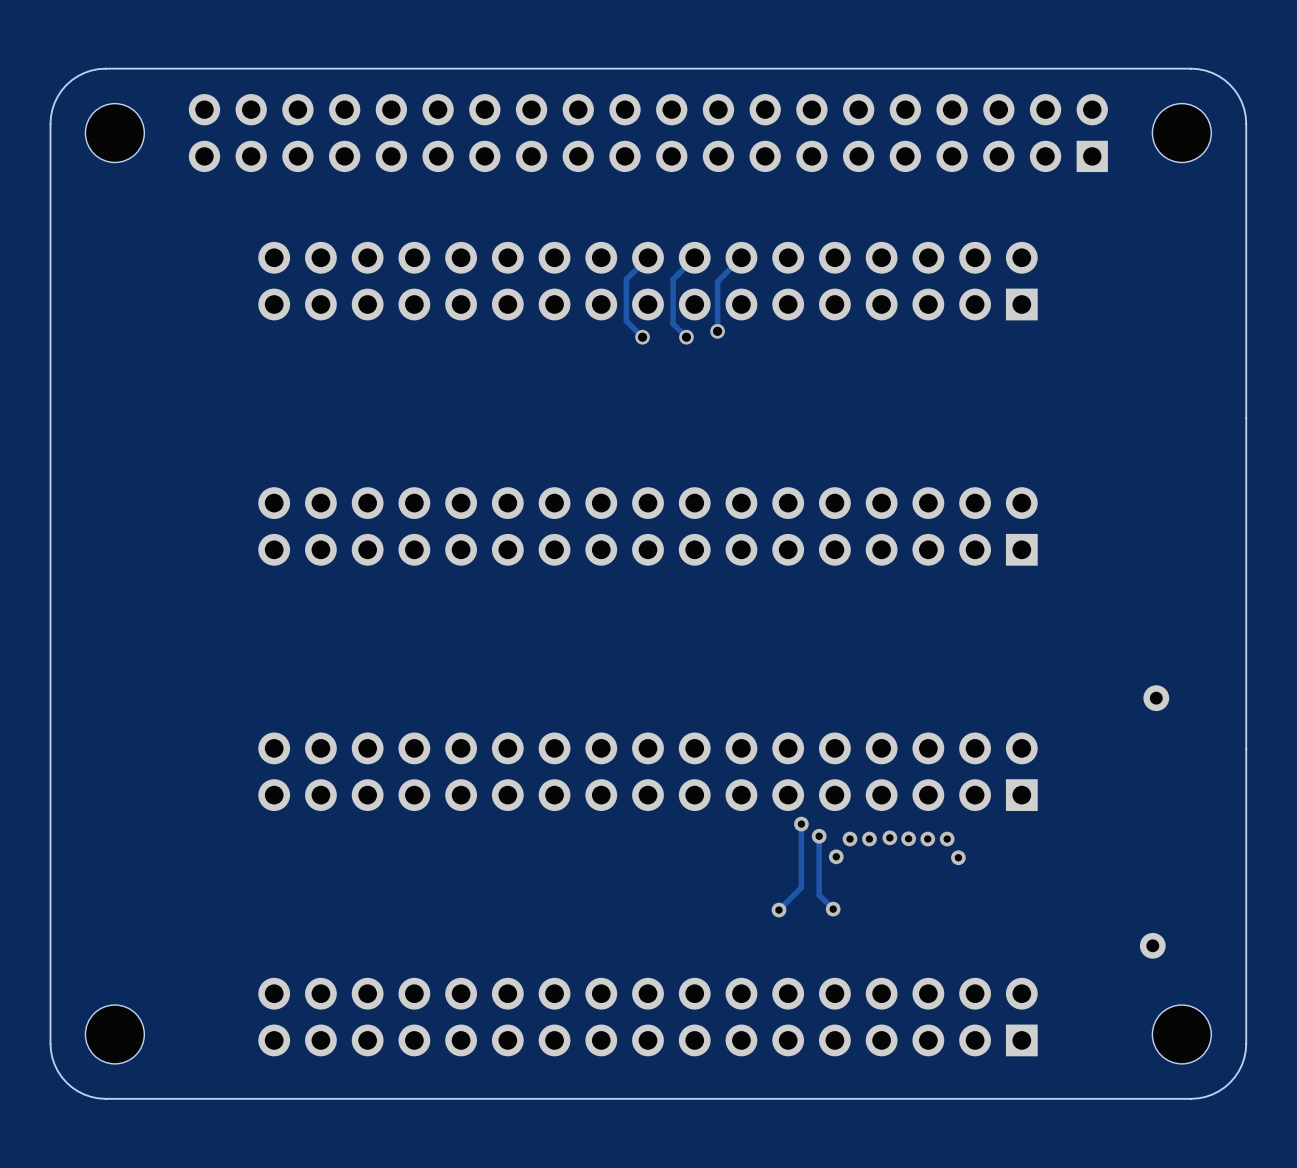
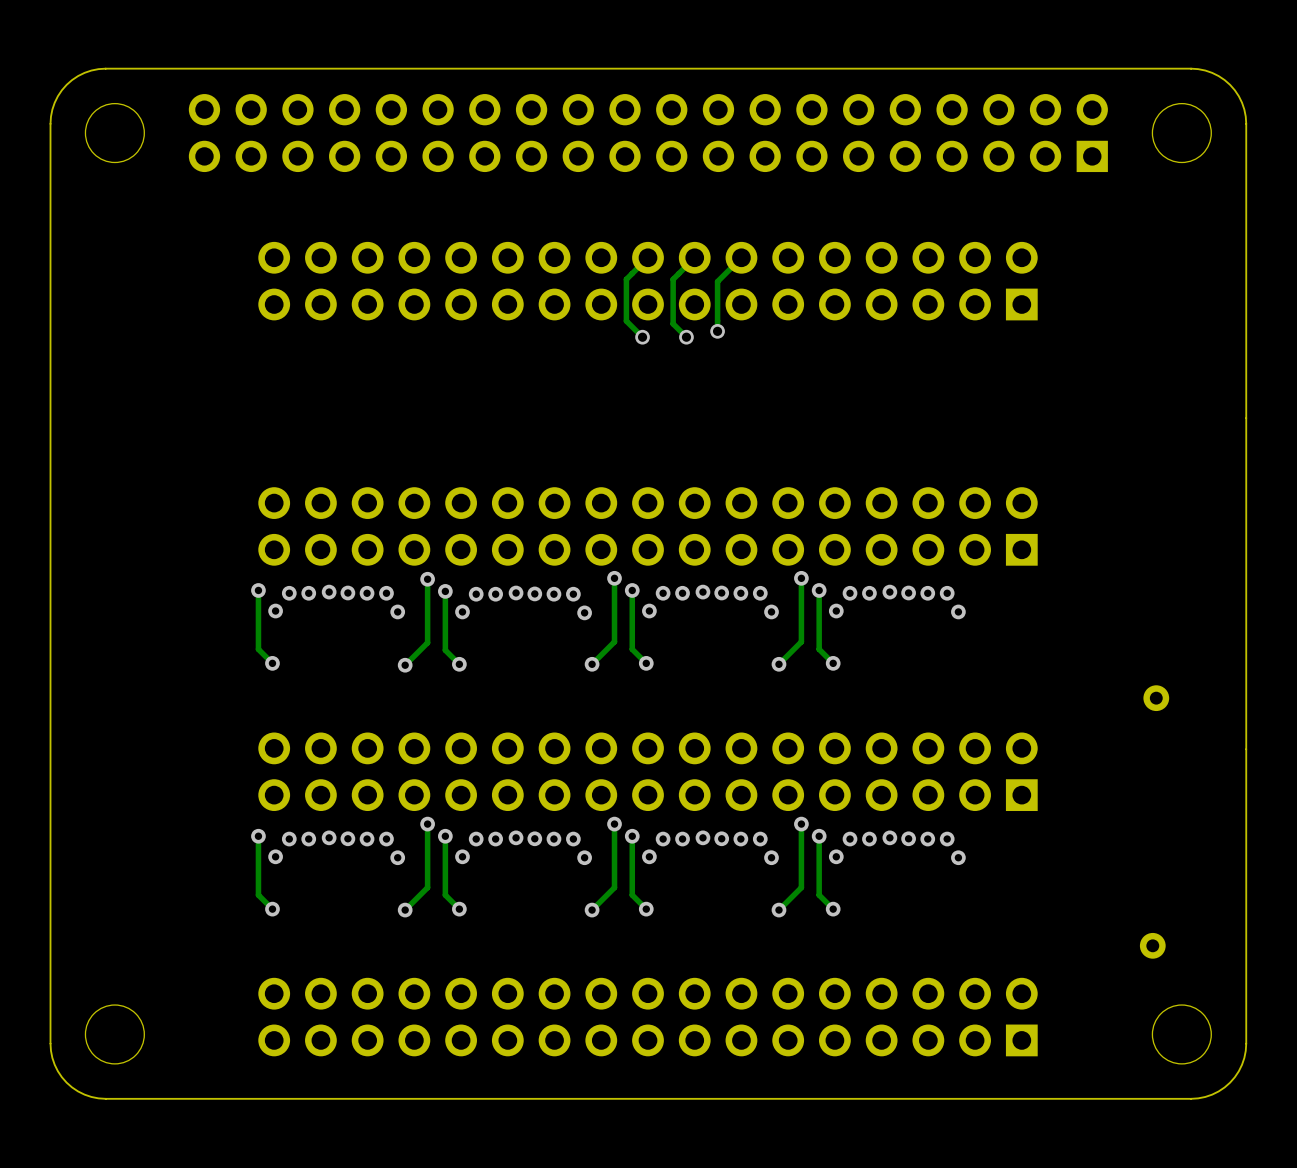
track: none -> (614, 578) (614, 641) (592, 664)
via: none -> (614, 578)
track: none -> (801, 578) (801, 641) (778, 664)
via: none -> (801, 578)
track: none -> (427, 579) (427, 642) (405, 665)
via: none -> (427, 579)
track: none -> (258, 590) (258, 649) (272, 663)
via: none -> (258, 590)
track: none -> (632, 590) (632, 649) (646, 663)
via: none -> (632, 590)
track: none -> (819, 590) (819, 649) (833, 663)
via: none -> (819, 590)
track: none -> (445, 591) (445, 650) (459, 664)
via: none -> (445, 591)
via: none -> (329, 592)
via: none -> (702, 592)
via: none -> (889, 592)
via: none -> (289, 593)
via: none -> (308, 593)
via: none -> (347, 593)
via: none -> (367, 593)
via: none -> (386, 593)
via: none -> (516, 593)
via: none -> (534, 593)
via: none -> (663, 593)
via: none -> (682, 593)
via: none -> (721, 593)
via: none -> (740, 593)
via: none -> (760, 593)
via: none -> (850, 593)
via: none -> (869, 593)
via: none -> (908, 593)
via: none -> (927, 593)
via: none -> (947, 593)
via: none -> (476, 594)
via: none -> (495, 594)
via: none -> (553, 594)
via: none -> (573, 594)
via: none -> (275, 611)
via: none -> (397, 611)
via: none -> (462, 611)
via: none -> (649, 611)
via: none -> (771, 611)
via: none -> (836, 611)
via: none -> (958, 611)
via: none -> (584, 612)
via: none -> (272, 663)
via: none -> (646, 663)
via: none -> (833, 663)
via: none -> (459, 664)
via: none -> (592, 664)
via: none -> (778, 664)
via: none -> (405, 665)
track: none -> (427, 824) (427, 887) (405, 910)
via: none -> (427, 824)
track: none -> (614, 824) (614, 887) (592, 910)
via: none -> (614, 824)
track: none -> (258, 836) (258, 895) (272, 909)
via: none -> (258, 836)
track: none -> (445, 836) (445, 895) (459, 909)
via: none -> (445, 836)
track: none -> (632, 836) (632, 895) (646, 909)
via: none -> (632, 836)
via: none -> (329, 837)
via: none -> (516, 837)
via: none -> (702, 837)
via: none -> (347, 838)
via: none -> (534, 838)
via: none -> (721, 838)
via: none -> (289, 839)
via: none -> (308, 839)
via: none -> (367, 839)
via: none -> (386, 839)
via: none -> (476, 839)
via: none -> (495, 839)
via: none -> (553, 839)
via: none -> (573, 839)
via: none -> (663, 839)
via: none -> (682, 839)
via: none -> (740, 839)
via: none -> (760, 839)
via: none -> (275, 856)
via: none -> (462, 856)
via: none -> (649, 856)
via: none -> (397, 857)
via: none -> (584, 857)
via: none -> (771, 857)
via: none -> (272, 909)
via: none -> (459, 909)
via: none -> (646, 909)
via: none -> (405, 910)
via: none -> (592, 910)

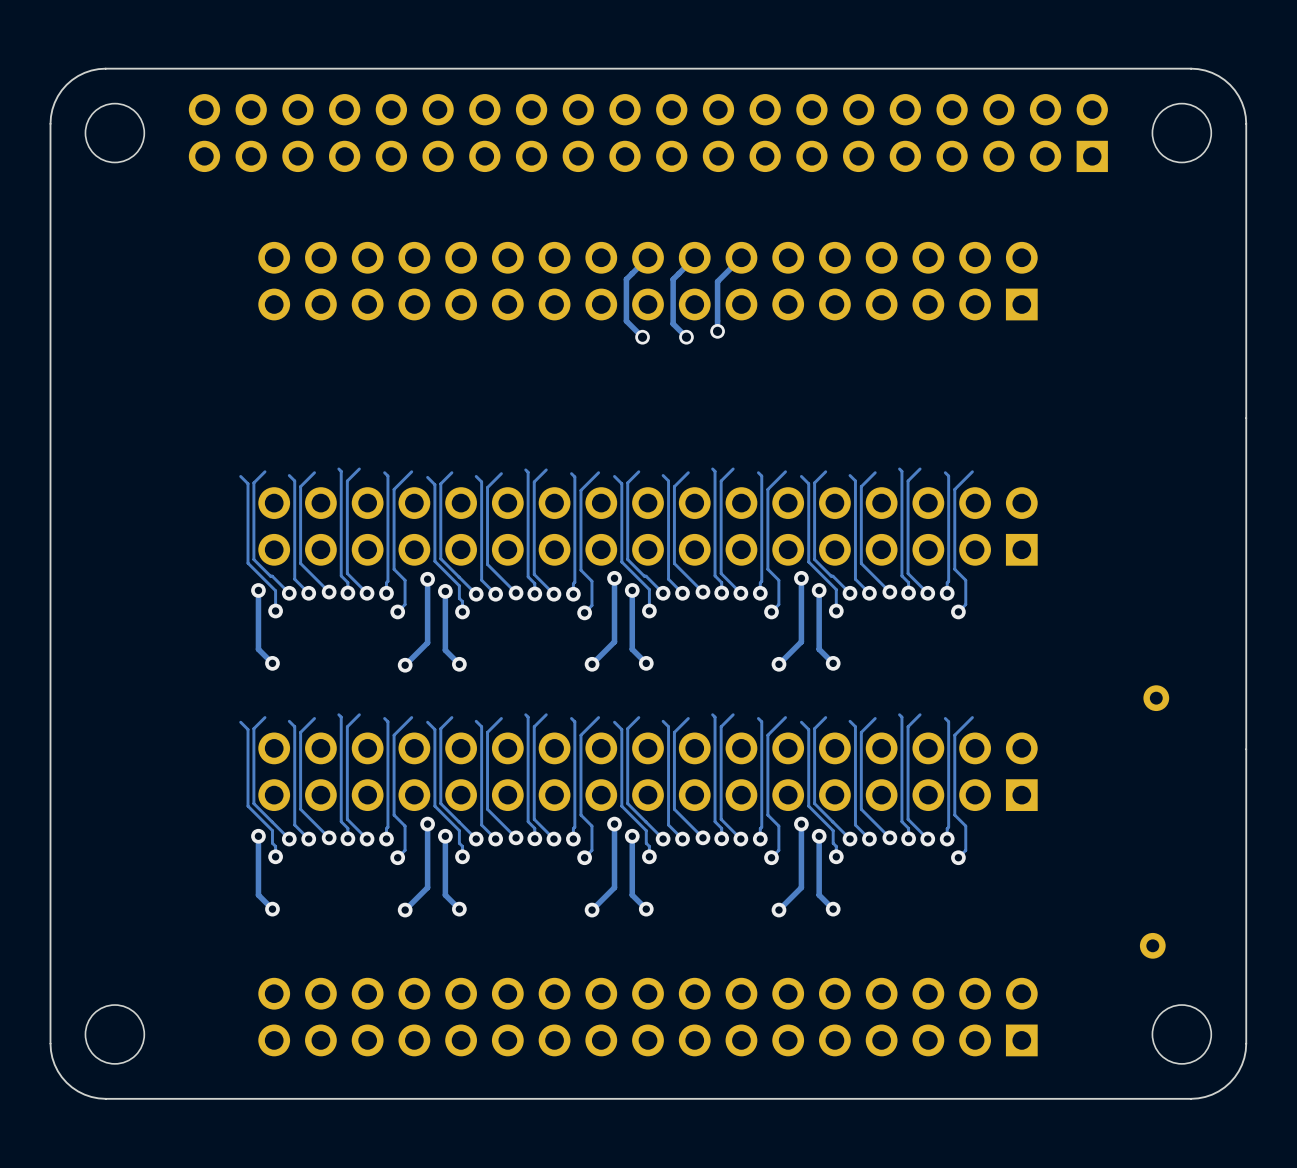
track: none -> (338, 468) (341, 471) (341, 575) (347, 582) (347, 593)
track: none -> (359, 468) (347, 481) (347, 573) (367, 593)
track: none -> (712, 468) (715, 471) (715, 575) (721, 582) (721, 593)
track: none -> (733, 468) (721, 481) (721, 573) (740, 593)
track: none -> (899, 468) (901, 471) (901, 575) (908, 582) (908, 593)
track: none -> (920, 468) (908, 481) (908, 573) (927, 593)
track: none -> (525, 469) (528, 472) (528, 576) (534, 583) (534, 593)
track: none -> (546, 469) (534, 481) (534, 574) (553, 594)
track: none -> (265, 471) (253, 482) (253, 559) (289, 593)
track: none -> (411, 471) (394, 489) (394, 569) (405, 580) (405, 604) (397, 611)
track: none -> (638, 471) (627, 482) (627, 559) (663, 593)
track: none -> (785, 471) (767, 489) (767, 569) (778, 580) (778, 604) (771, 611)
track: none -> (825, 471) (814, 482) (814, 559) (850, 593)
track: none -> (972, 471) (954, 489) (954, 569) (965, 580) (965, 604) (958, 611)
track: none -> (314, 472) (300, 486) (300, 563) (329, 592)
track: none -> (384, 472) (387, 476) (386, 593)
track: none -> (451, 472) (440, 483) (440, 558) (476, 594)
track: none -> (598, 472) (580, 490) (580, 570) (591, 581) (591, 605) (584, 612)
track: none -> (688, 472) (674, 486) (674, 563) (702, 592)
track: none -> (758, 472) (761, 476) (760, 593)
track: none -> (875, 472) (861, 486) (861, 563) (889, 592)
track: none -> (945, 472) (948, 476) (947, 593)
track: none -> (501, 473) (487, 487) (487, 564) (516, 593)
track: none -> (571, 473) (574, 476) (573, 594)
track: none -> (289, 475) (294, 480) (294, 579) (308, 593)
track: none -> (663, 475) (668, 480) (668, 579) (682, 593)
track: none -> (850, 475) (855, 480) (855, 579) (869, 593)
track: none -> (240, 476) (248, 483) (248, 563) (275, 590) (275, 611)
track: none -> (476, 476) (481, 481) (481, 580) (495, 594)
track: none -> (614, 476) (621, 483) (621, 561) (649, 589) (649, 611)
track: none -> (801, 476) (808, 483) (808, 561) (836, 589) (836, 611)
track: none -> (427, 477) (434, 484) (434, 561) (459, 585) (462, 611)
track: none -> (338, 714) (341, 717) (341, 821) (347, 828) (347, 838)
track: none -> (359, 714) (347, 726) (347, 819) (367, 839)
track: none -> (525, 714) (528, 717) (528, 821) (534, 828) (534, 838)
track: none -> (546, 714) (534, 726) (534, 819) (553, 839)
track: none -> (712, 714) (715, 717) (715, 821) (721, 828) (721, 838)
track: none -> (733, 714) (721, 726) (721, 819) (740, 839)
track: none -> (899, 714) (901, 717) (901, 821) (908, 828) (908, 838)
track: none -> (920, 714) (908, 726) (908, 819) (927, 839)
track: none -> (265, 717) (253, 728) (253, 803) (289, 839)
track: none -> (411, 717) (394, 735) (394, 815) (405, 826) (405, 850) (397, 857)
track: none -> (451, 717) (440, 728) (440, 803) (476, 839)
track: none -> (598, 717) (580, 735) (580, 815) (591, 826) (591, 850) (584, 857)
track: none -> (638, 717) (627, 728) (627, 803) (663, 839)
track: none -> (785, 717) (767, 735) (767, 815) (778, 826) (778, 850) (771, 857)
track: none -> (825, 717) (814, 728) (814, 803) (850, 839)
track: none -> (972, 717) (954, 735) (954, 815) (965, 826) (965, 850) (958, 857)
track: none -> (314, 718) (300, 732) (300, 809) (329, 837)
track: none -> (384, 718) (387, 721) (386, 839)
track: none -> (501, 718) (487, 732) (487, 809) (516, 837)
track: none -> (571, 718) (574, 721) (573, 839)
track: none -> (688, 718) (674, 732) (674, 809) (702, 837)
track: none -> (758, 718) (761, 721) (760, 839)
track: none -> (875, 718) (861, 732) (861, 809) (889, 837)
track: none -> (945, 718) (948, 721) (947, 839)
track: none -> (289, 721) (294, 726) (294, 825) (308, 839)
track: none -> (476, 721) (481, 726) (481, 825) (495, 839)
track: none -> (663, 721) (668, 726) (668, 825) (682, 839)
track: none -> (850, 721) (855, 726) (855, 825) (869, 839)
track: none -> (240, 722) (248, 729) (248, 806) (272, 830) (275, 856)
track: none -> (427, 722) (434, 729) (434, 806) (459, 830) (462, 856)
track: none -> (614, 722) (621, 729) (621, 806) (646, 830) (649, 856)
track: none -> (801, 722) (808, 729) (808, 806) (833, 830) (836, 856)

